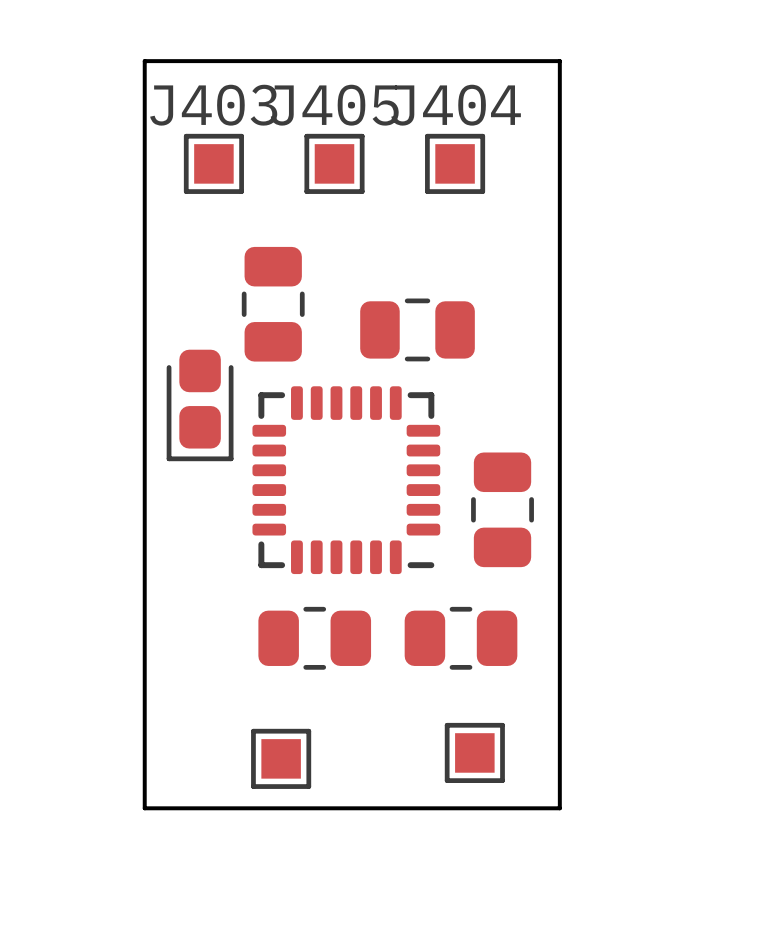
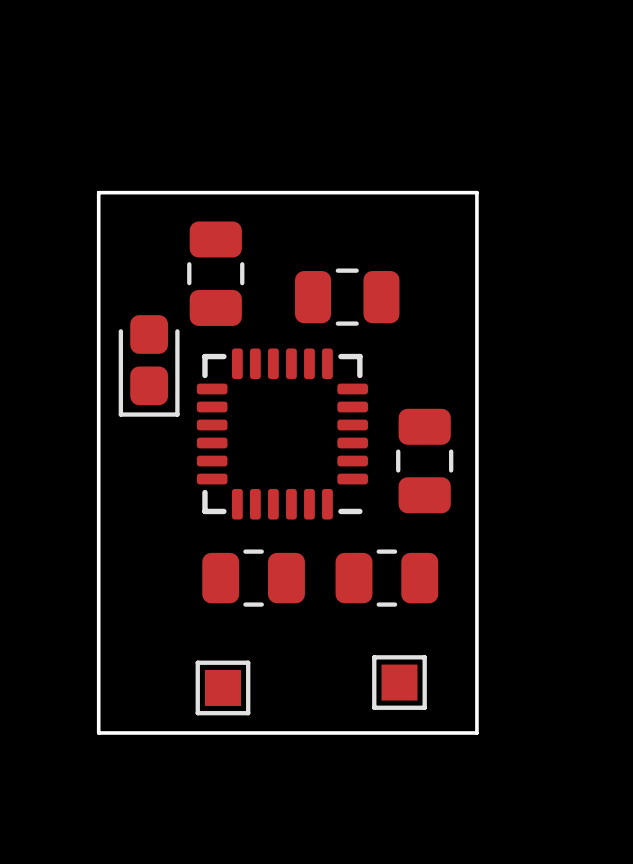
J403: (213, 163) -> none
J405: (334, 163) -> none
J404: (455, 163) -> none
board edge: (144, 215) (144, 61) (559, 61) (559, 215) -> (98, 192) (476, 192)

